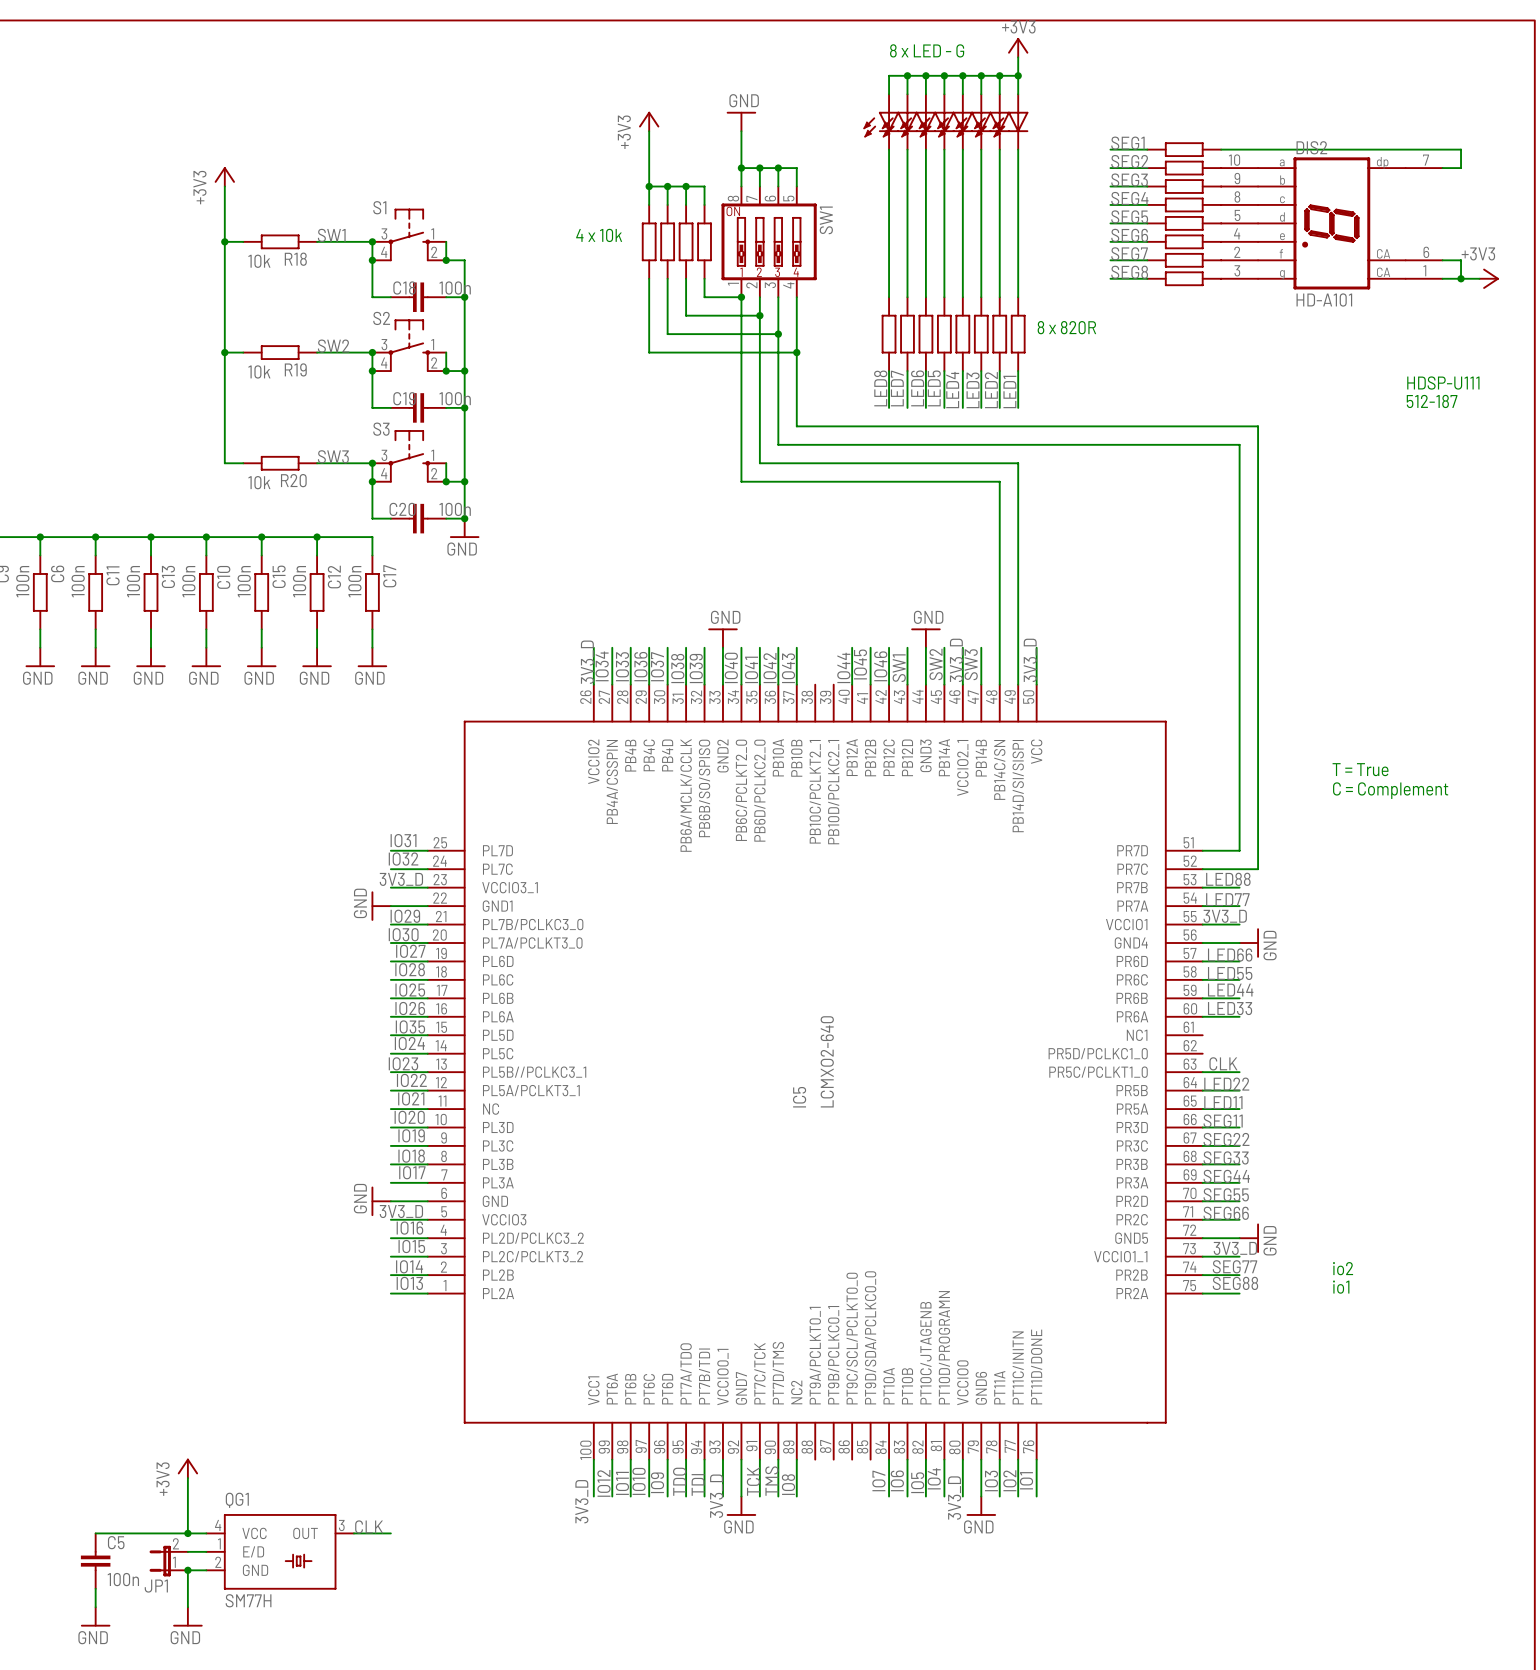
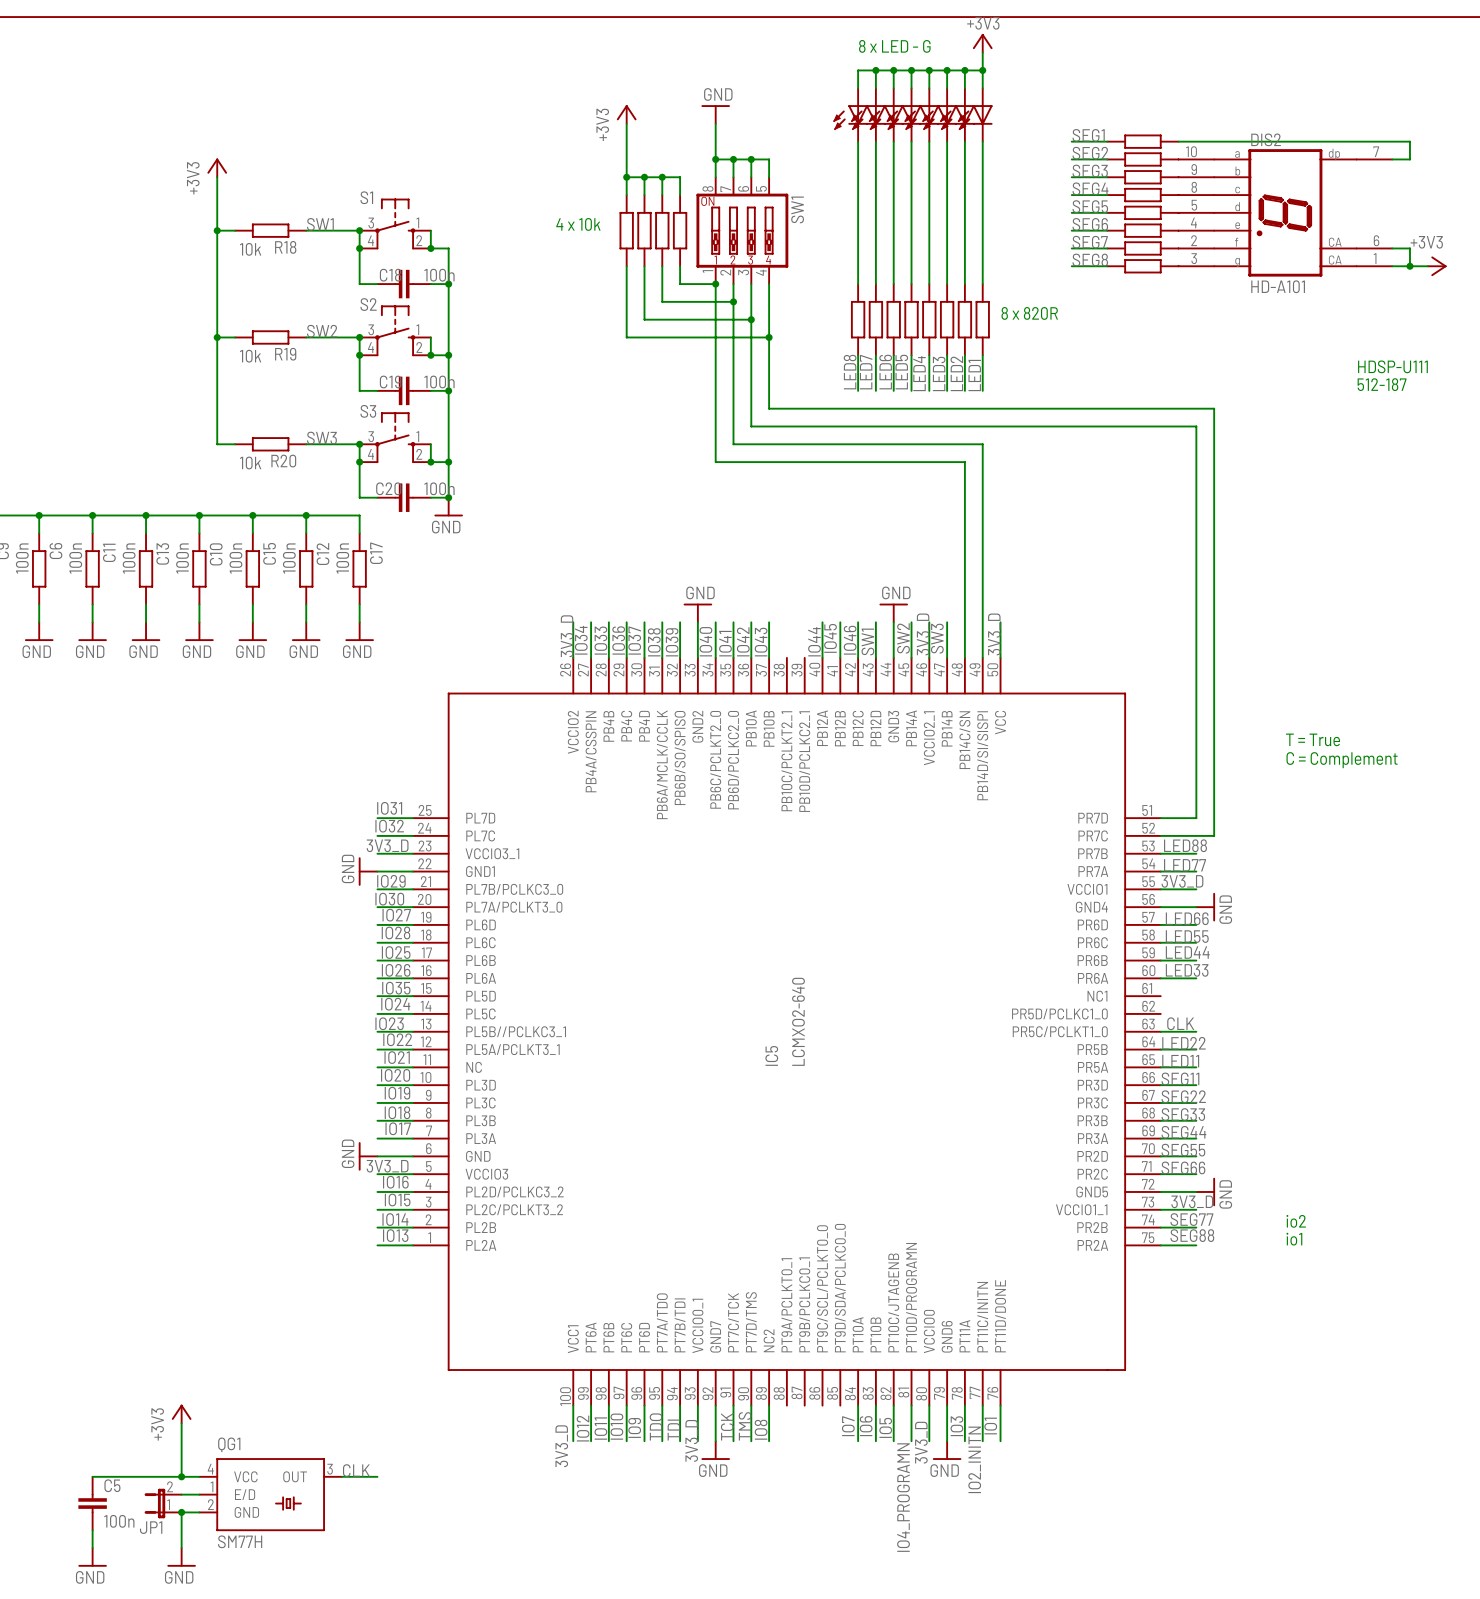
label: IO4 (934, 1478) -> none
label: IO2 (1009, 1480) -> none
label: none -> IO2_INITN (974, 1459)
label: none -> IO4_PROGRAMN (903, 1497)

